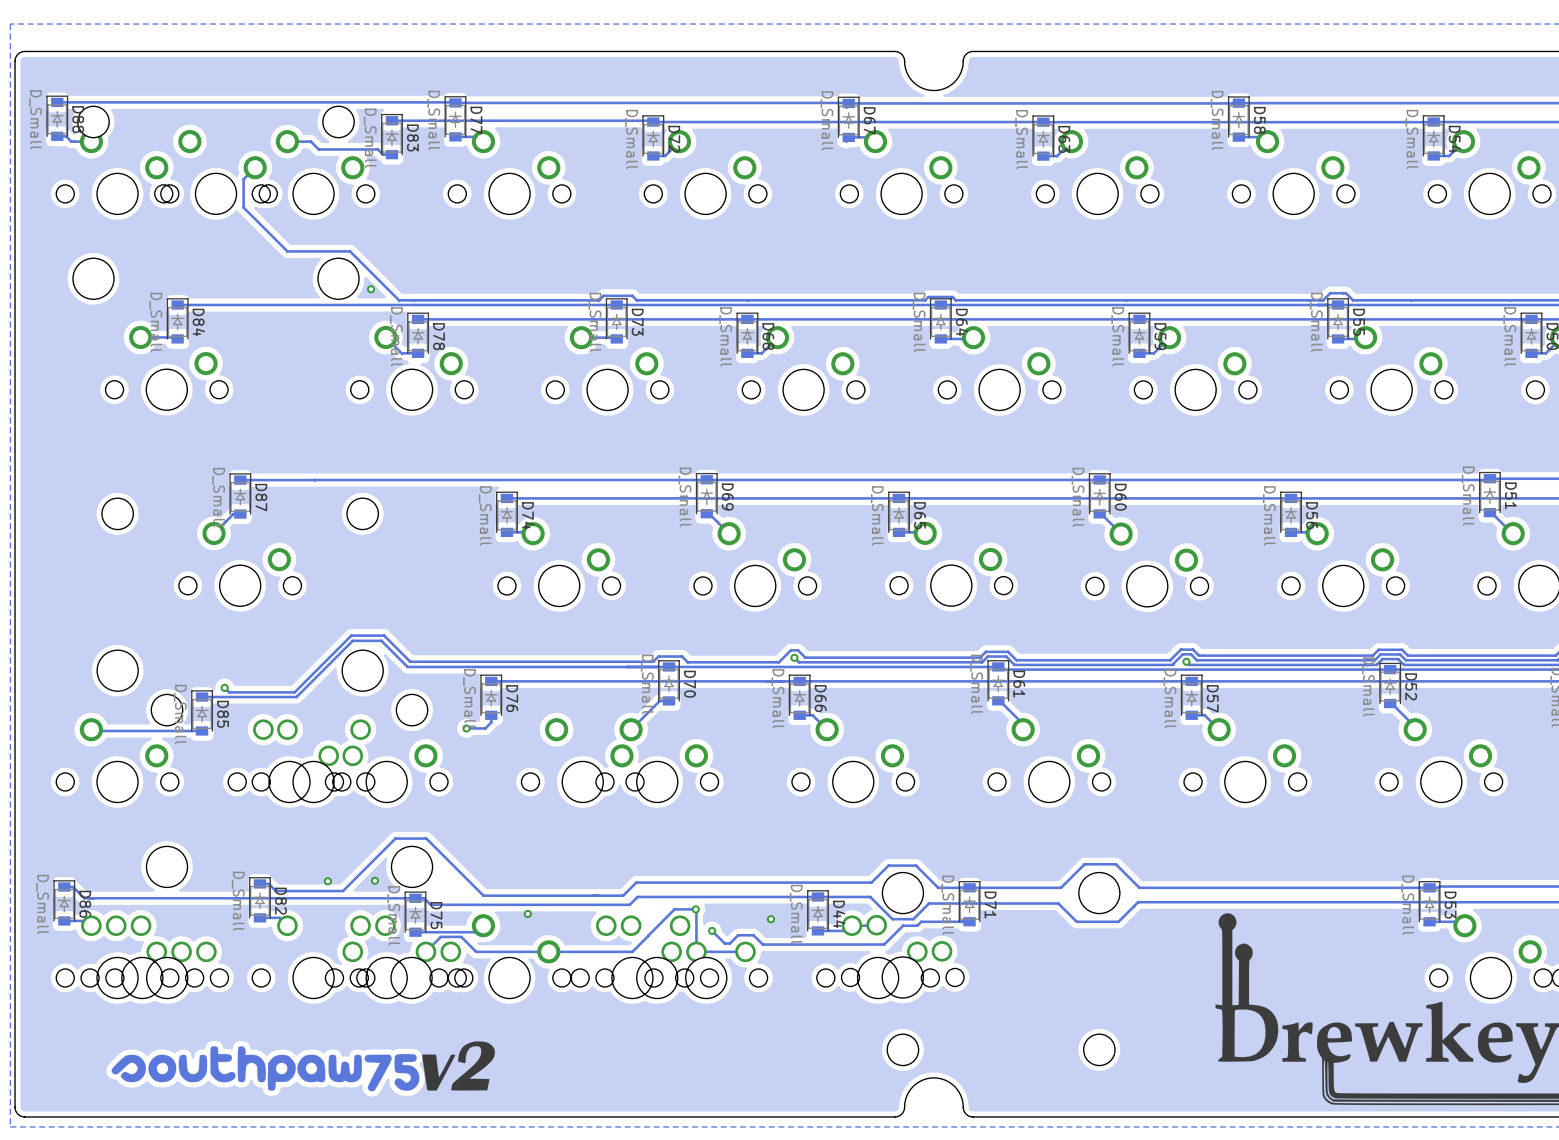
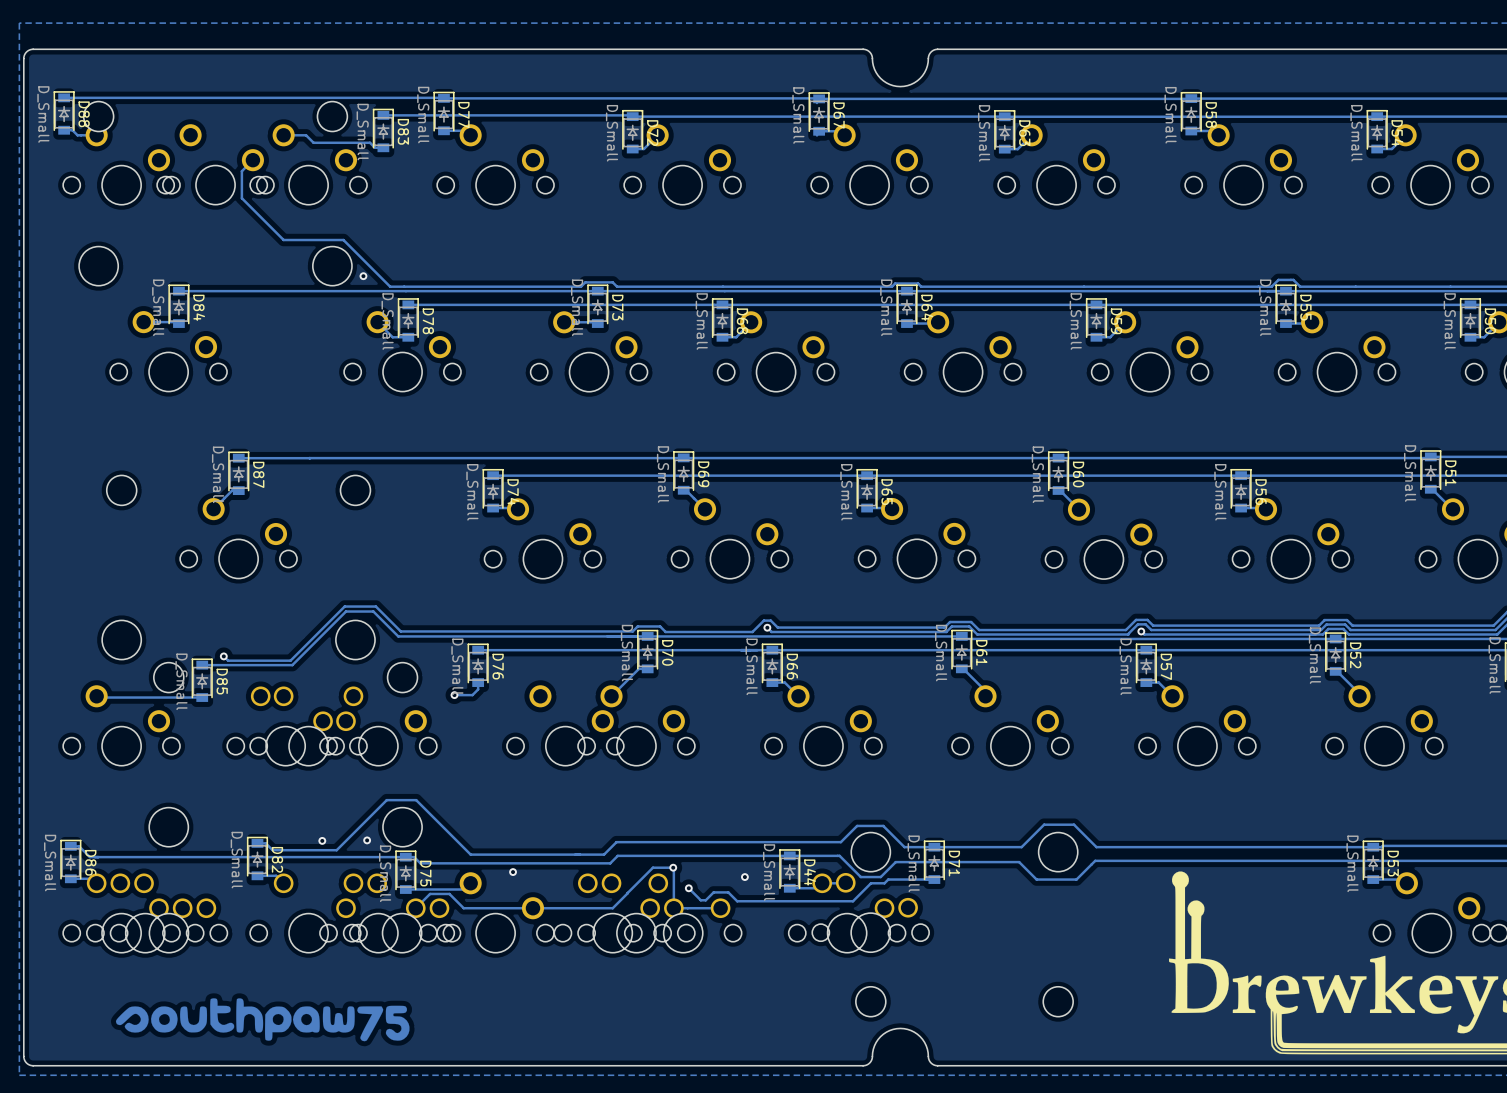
drawing: [422, 1041, 495, 1091] -> none

